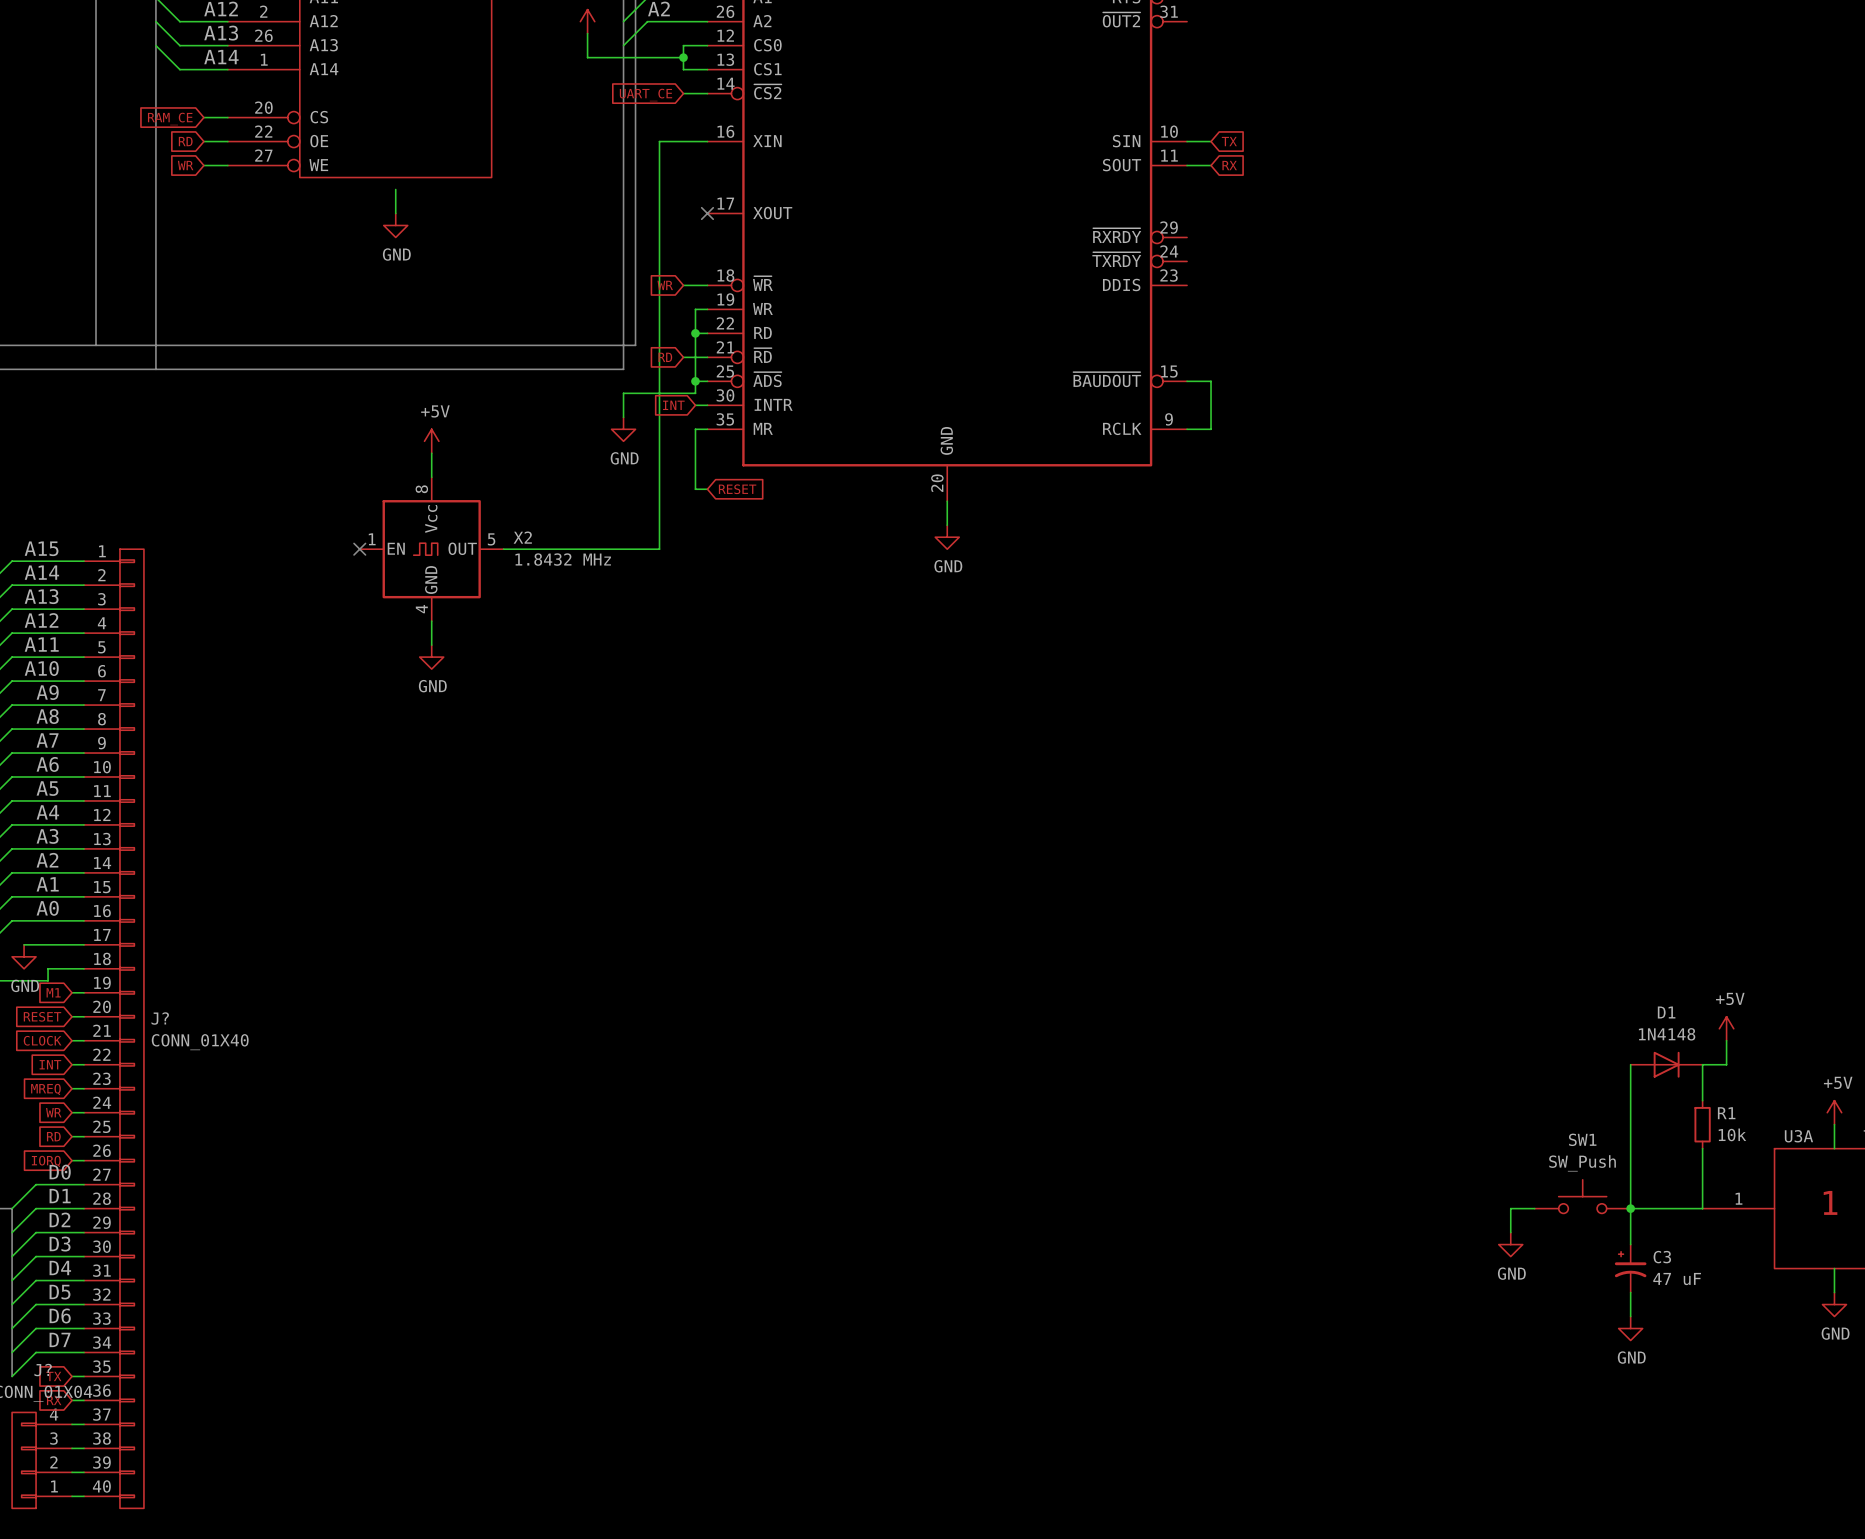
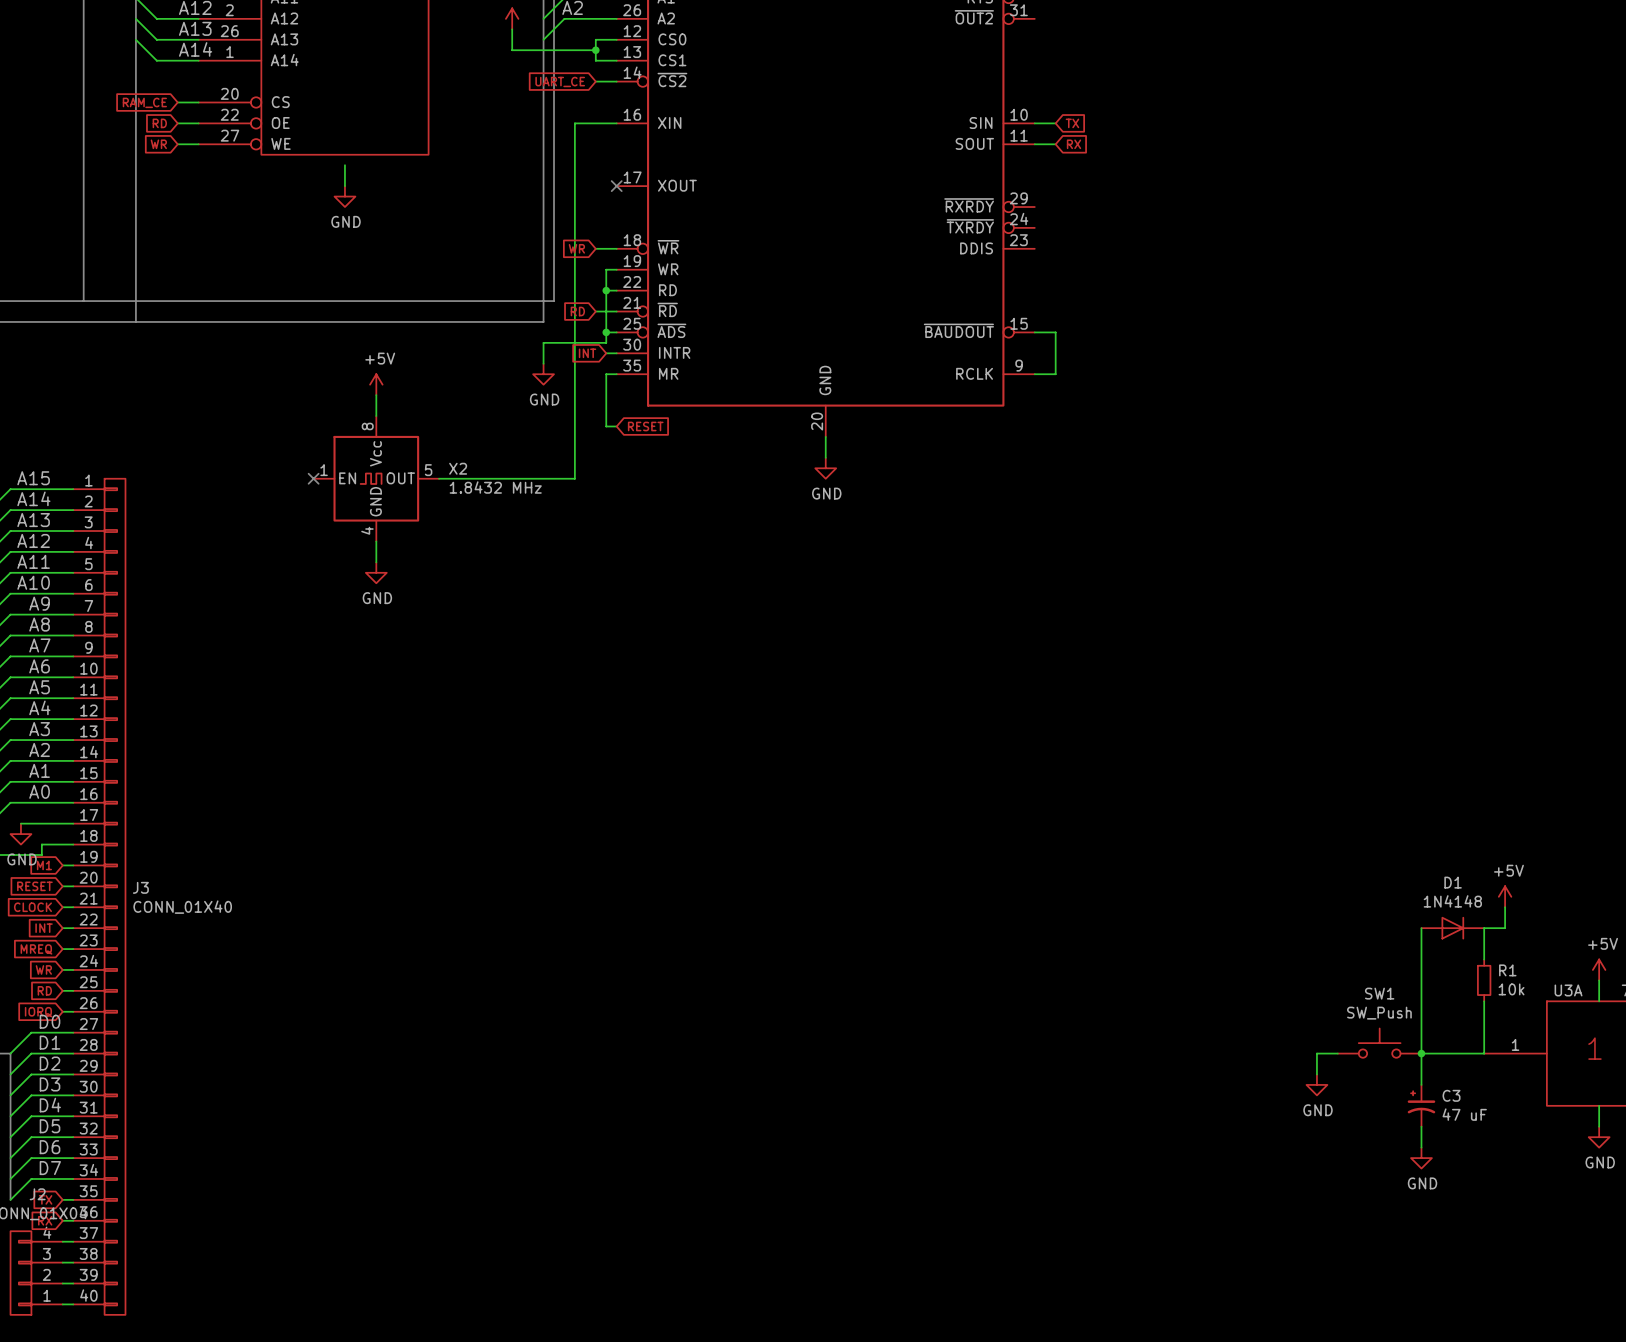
J? name: J? (160, 1018) -> J3 (140, 887)
J? name: J? (43, 1370) -> J2 (37, 1194)

